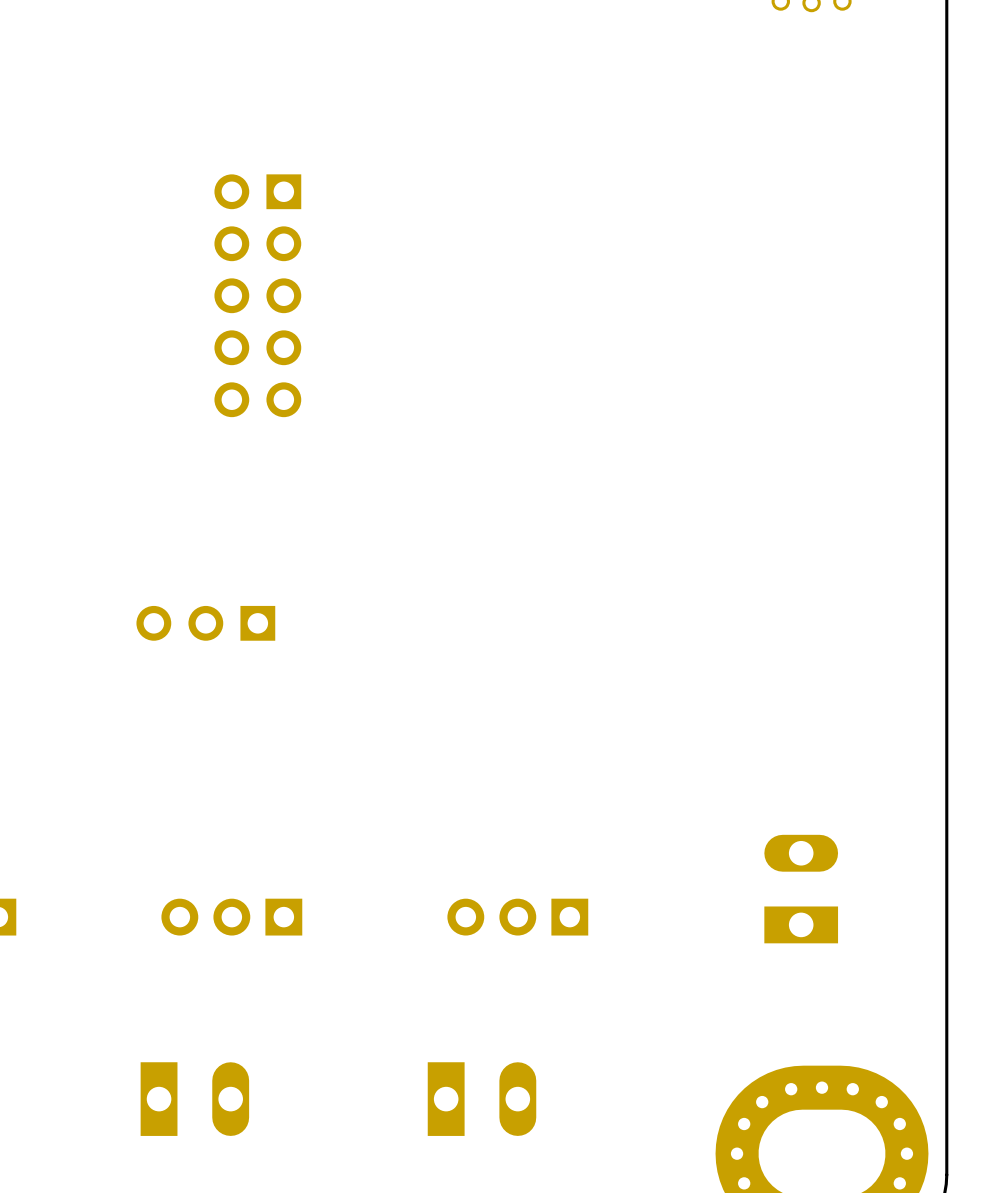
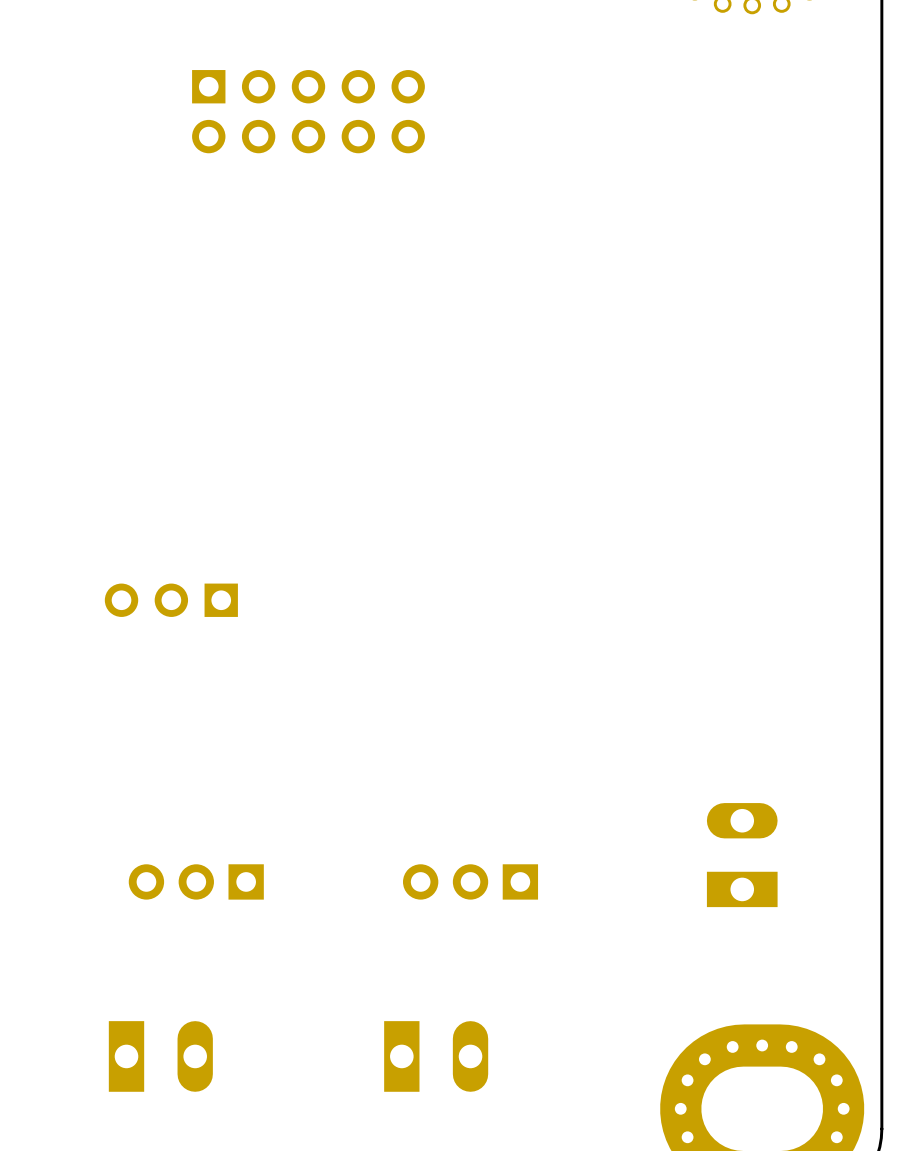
part rotation: 0° (257, 295) -> 90° counterclockwise (308, 111)
part position: (257, 295) -> (308, 111)

